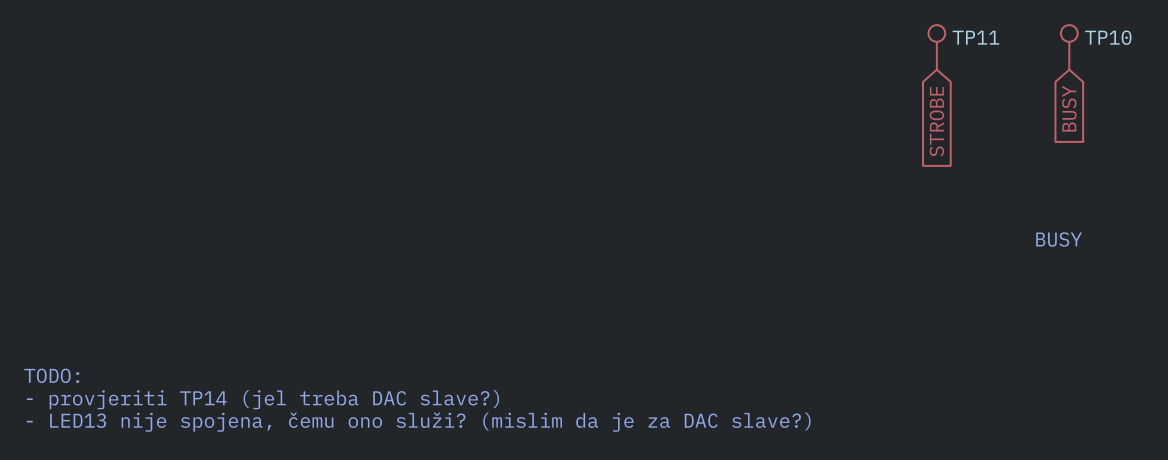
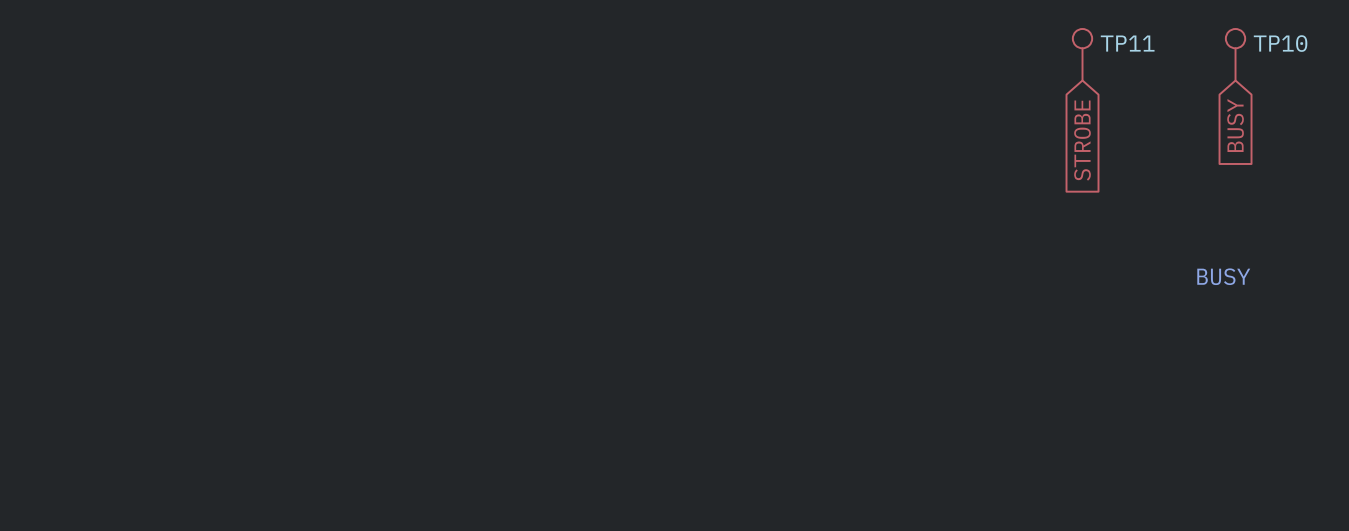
text: TODO: (51, 375) -> none
text: - provjeriti TP14 (jel treba DAC slave?) (262, 399) -> none
text: - LED13 nije spojena, čemu ono služi? (mislim da je za DAC slave?) (418, 421) -> none

